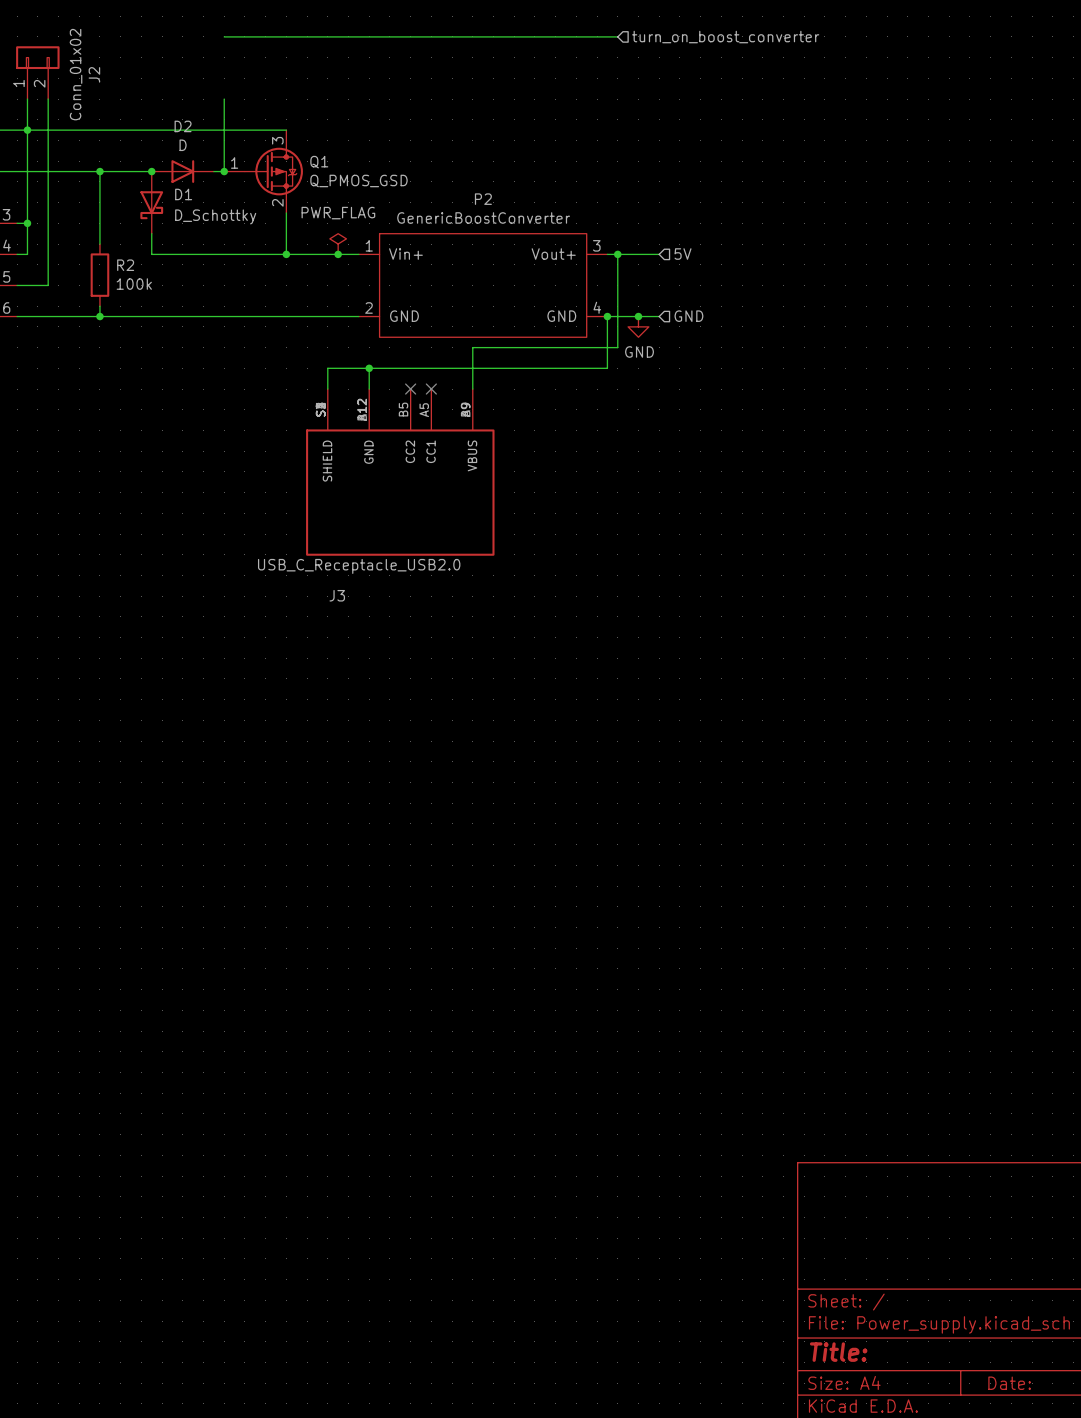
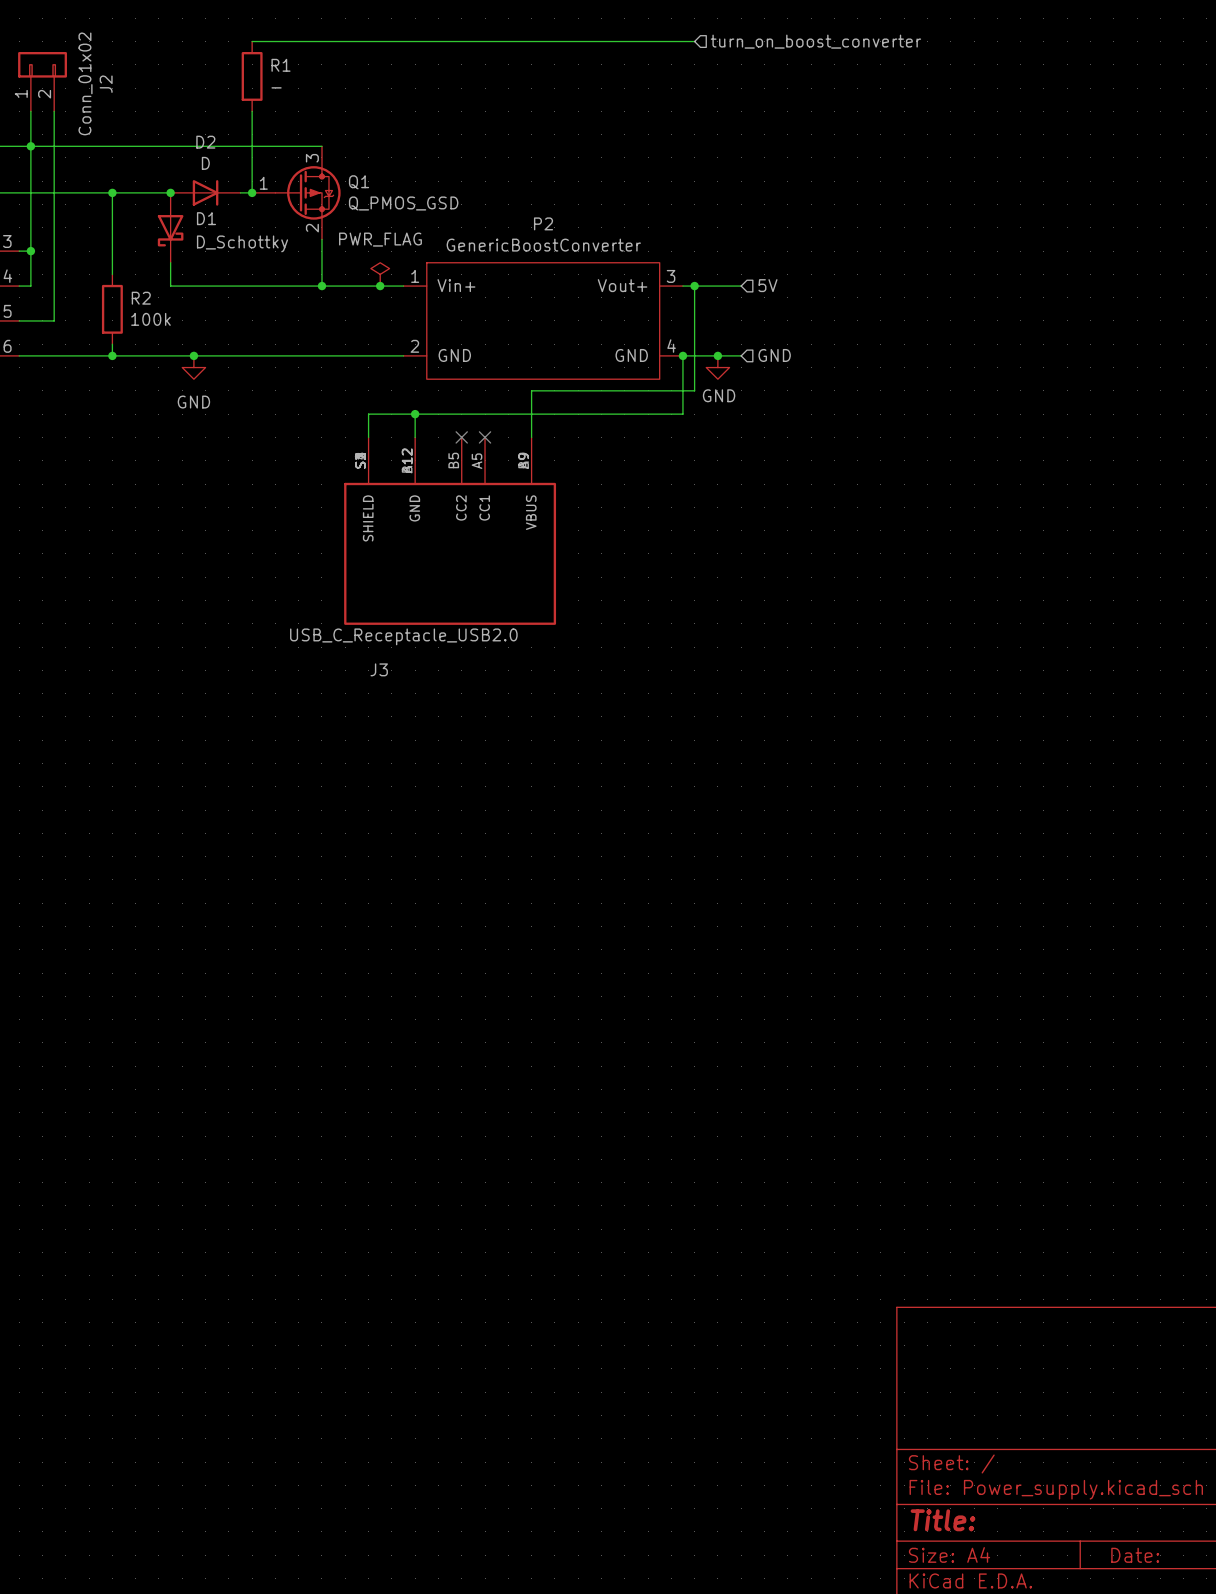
R1: none -> - (252, 76)
junction: none -> (193, 355)
power symbol: none -> GND (193, 367)

